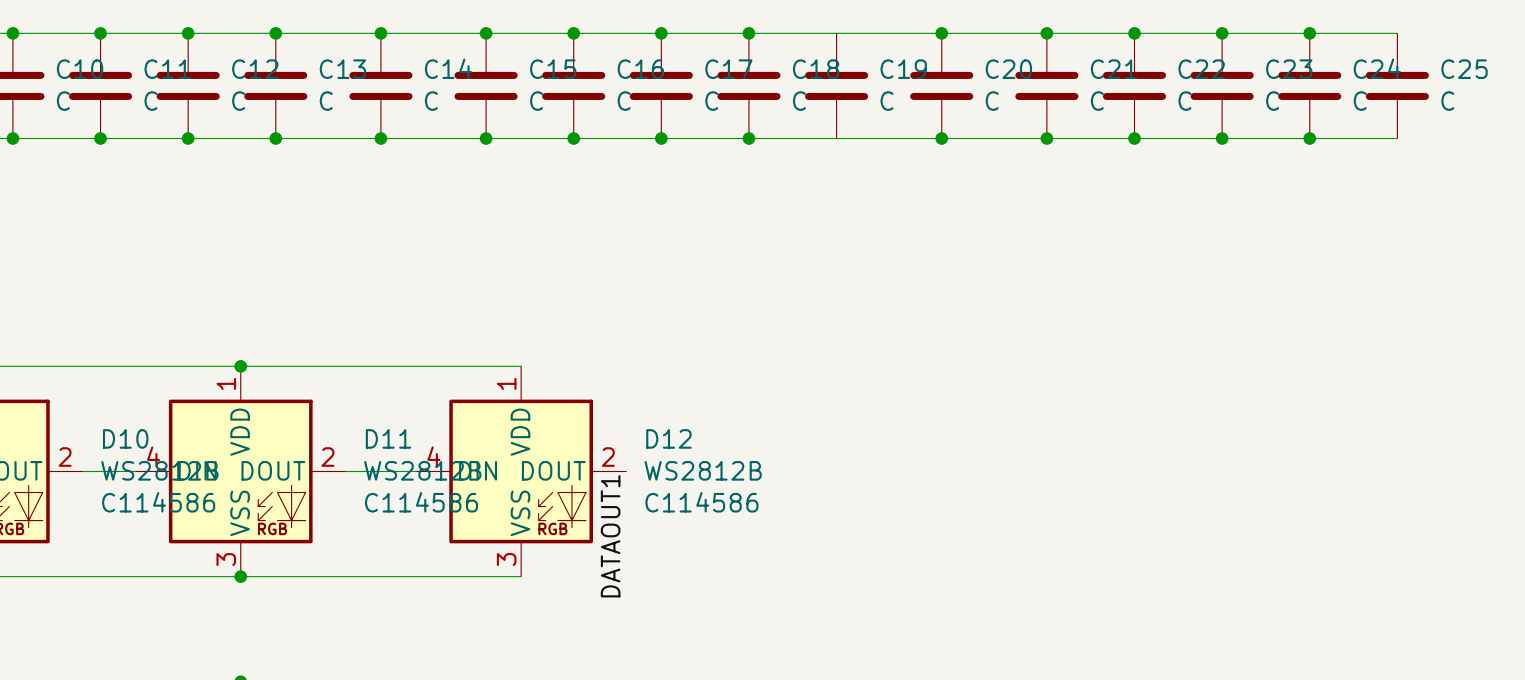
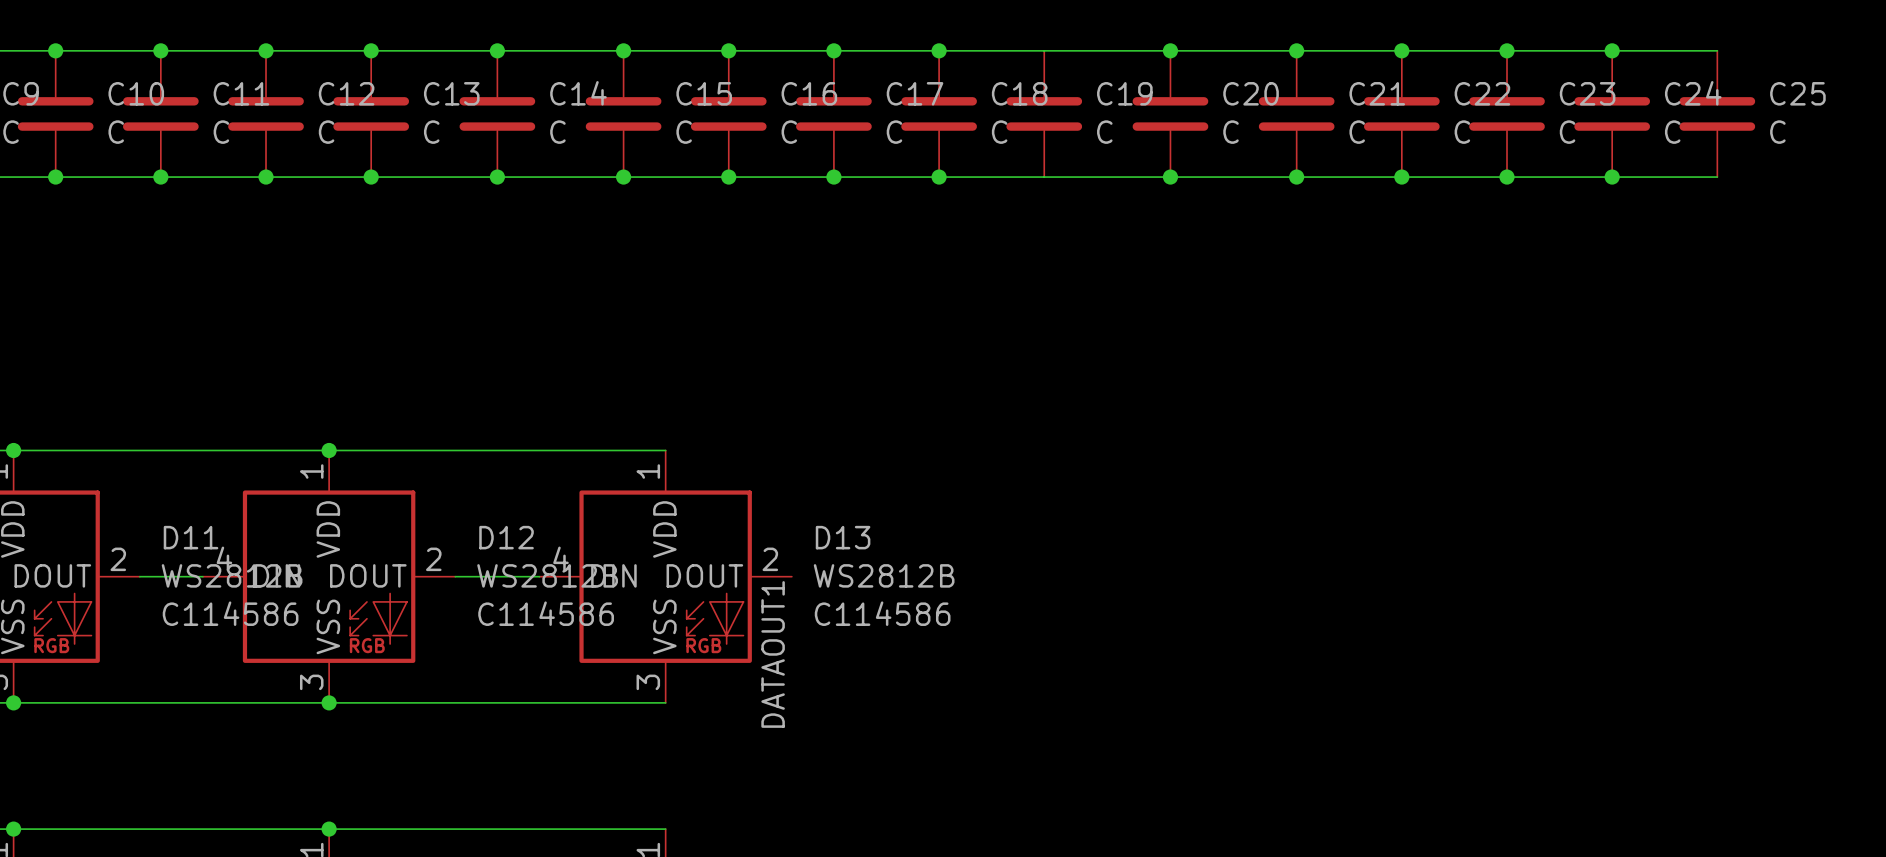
D10 name: D10 (125, 438) -> D11 (191, 537)
D11 name: D11 (388, 438) -> D12 (506, 537)
D12 name: D12 (668, 438) -> D13 (843, 537)

